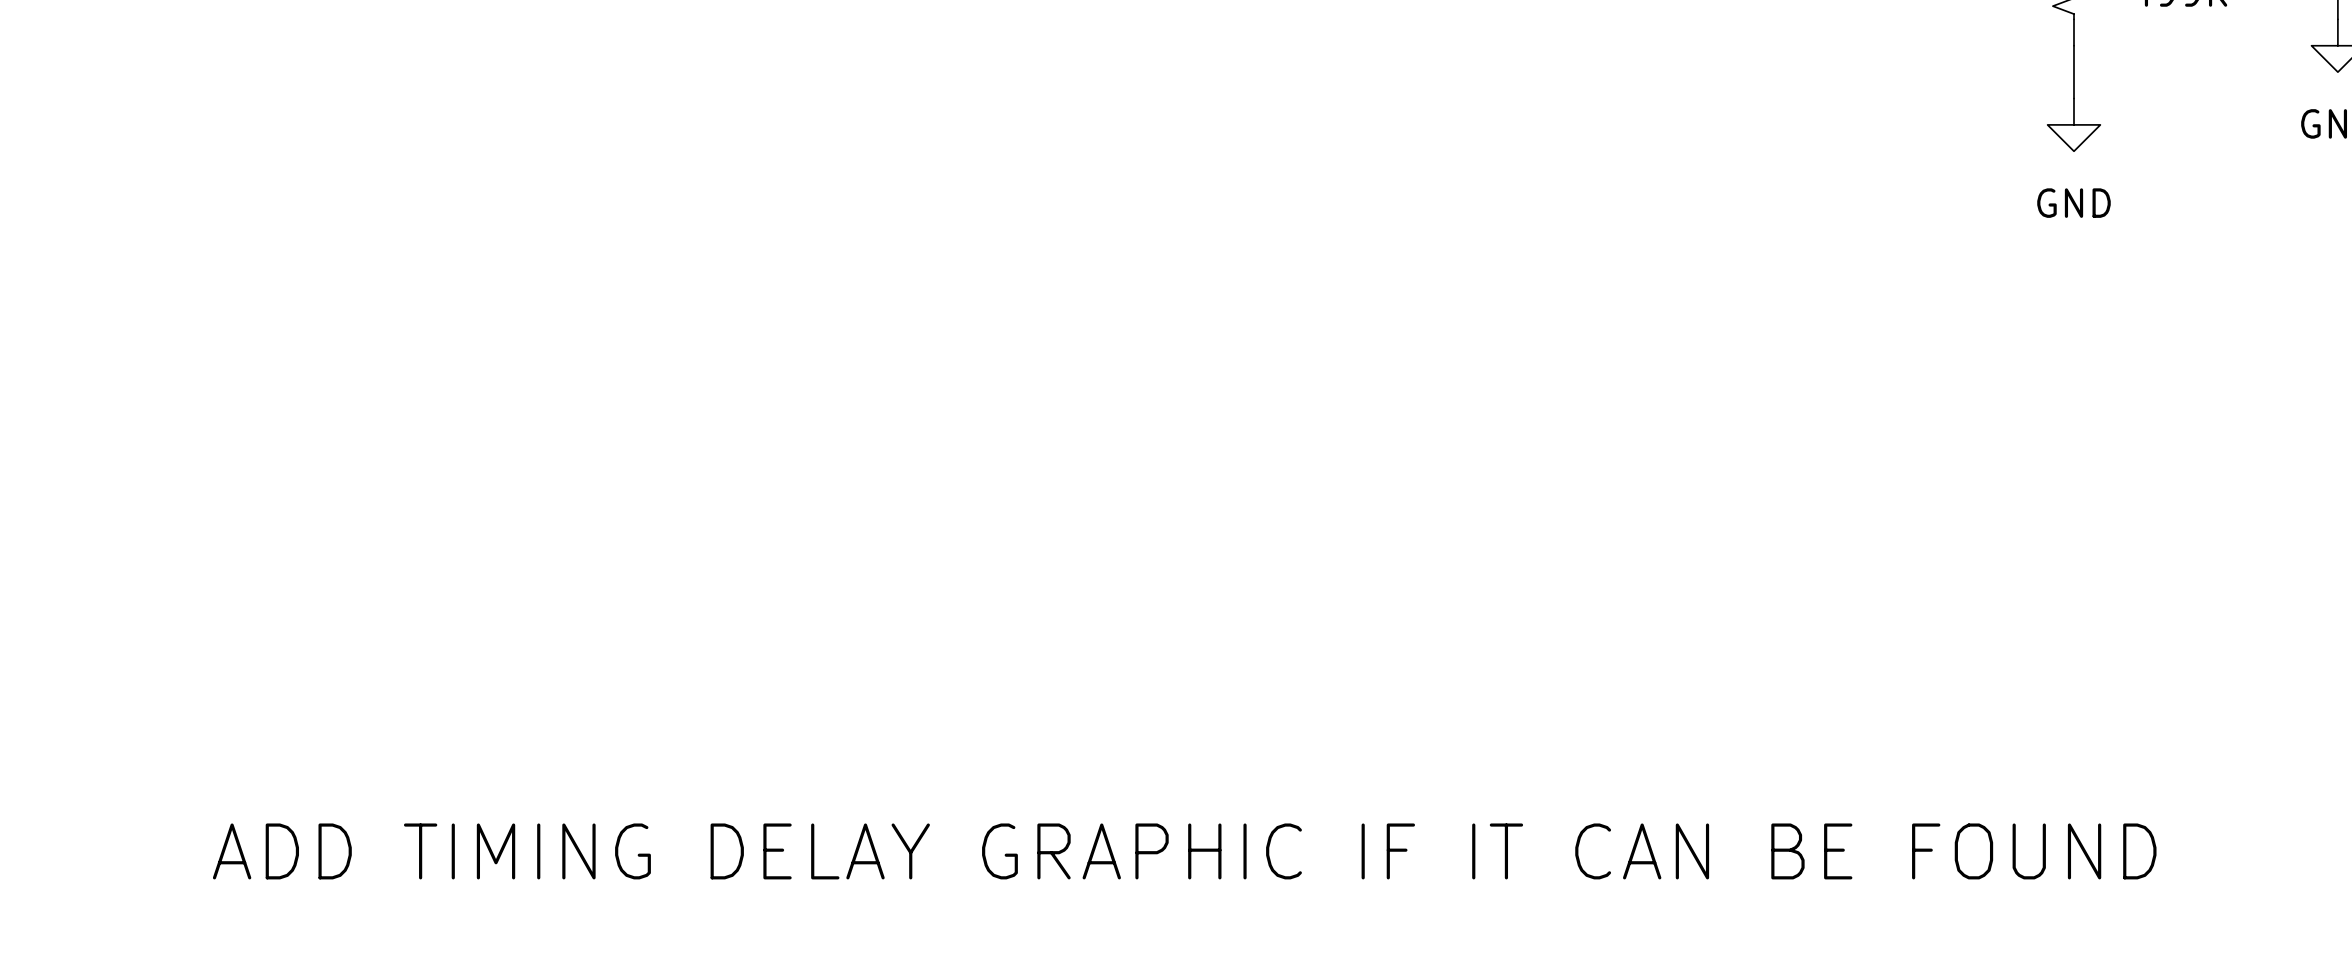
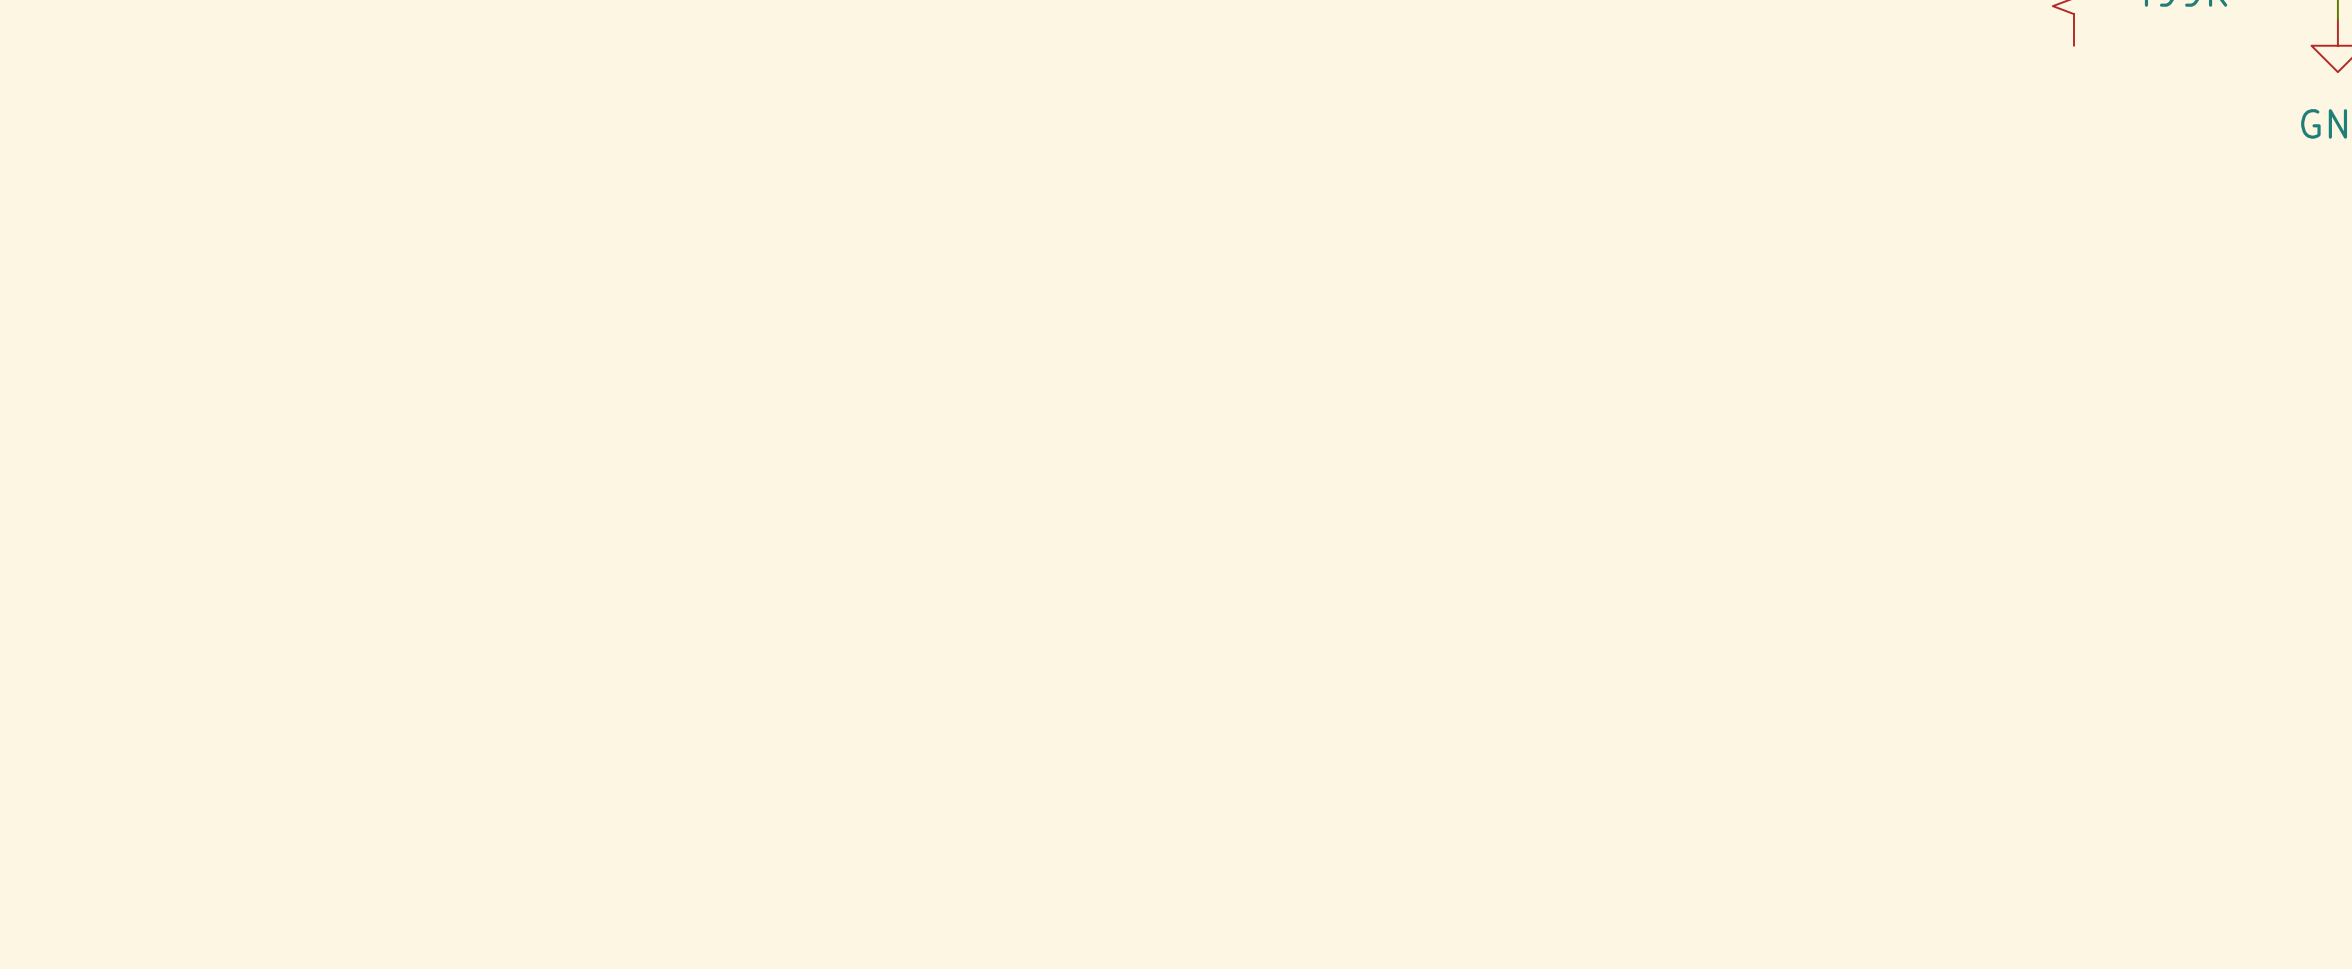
wire: (2073, 45) (2073, 98) -> none
power symbol: GND (2073, 124) -> none
text: ADD TIMING DELAY GRAPHIC IF IT CAN BE FOUND (1184, 851) -> none

